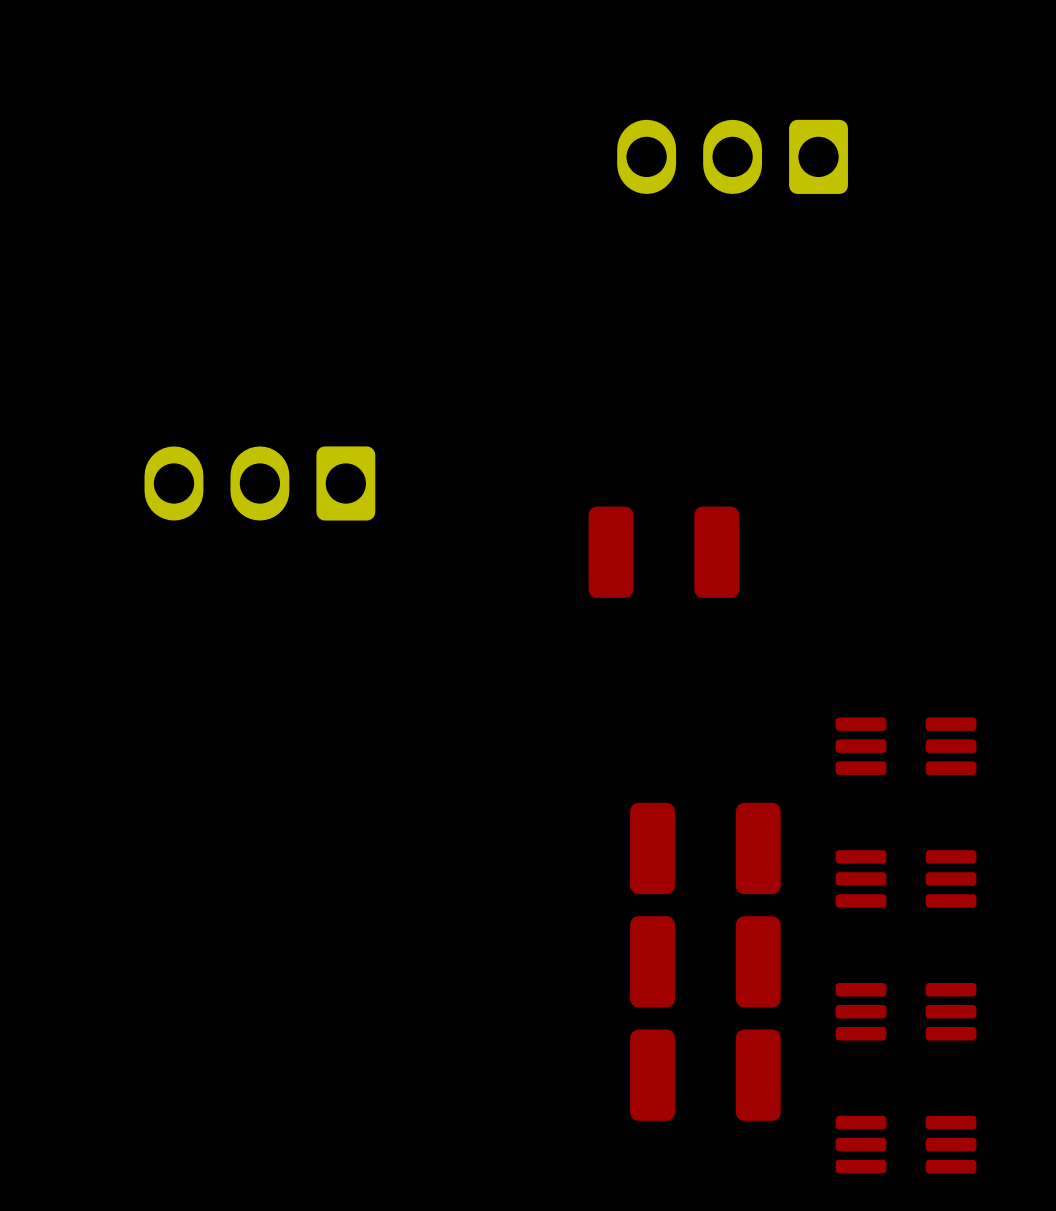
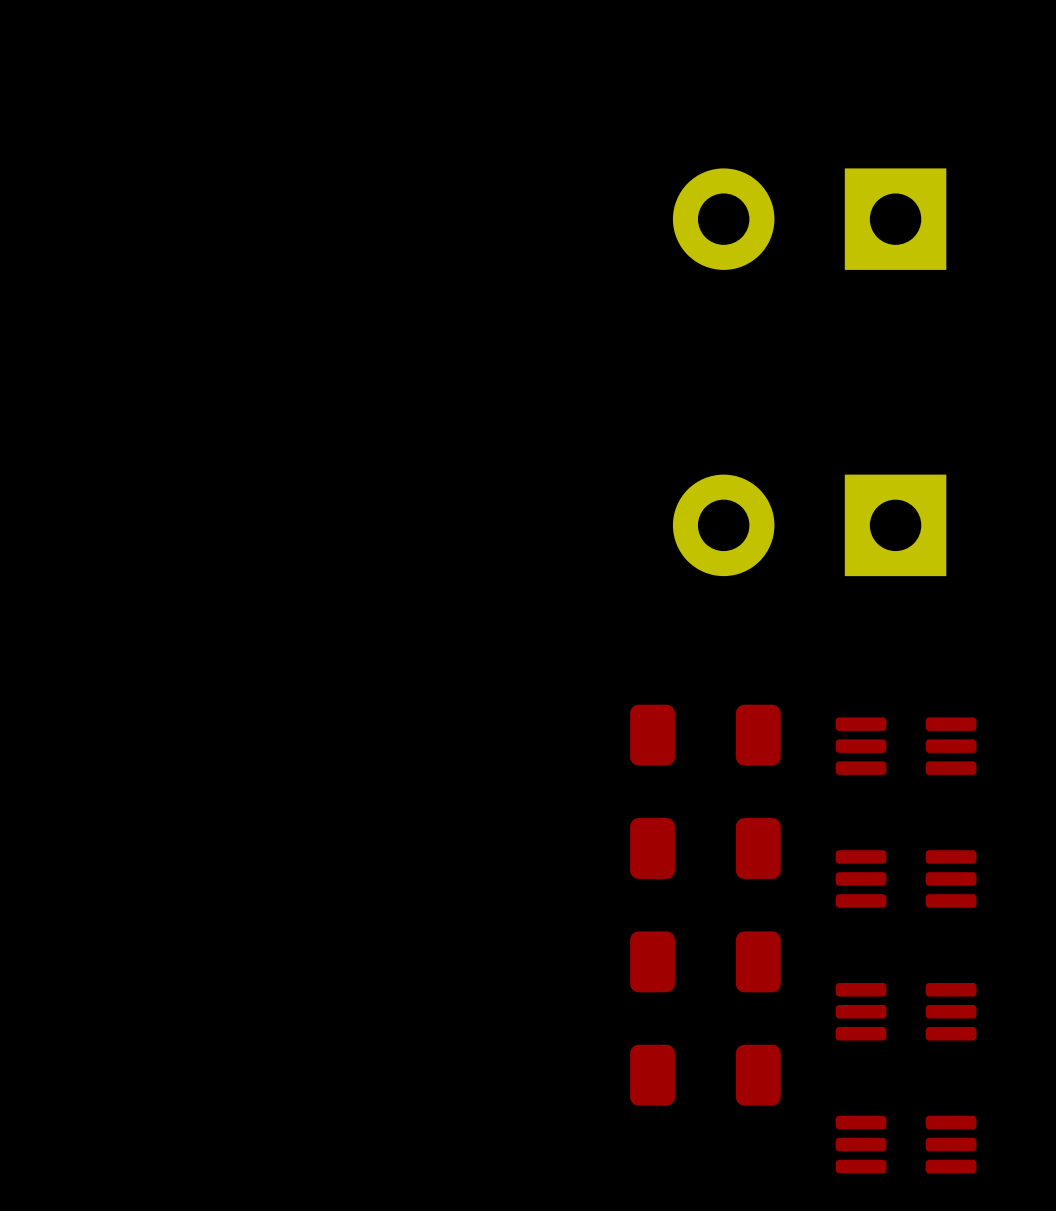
part: (732, 156) -> none
part: none -> (809, 219)
part: (259, 483) -> none
part: none -> (809, 525)
part: (663, 552) -> none
part: none -> (705, 735)
part footprint: [630, 802, 781, 895] -> [630, 818, 781, 879]
part footprint: [630, 916, 781, 1008] -> [630, 931, 781, 993]
part footprint: [630, 1029, 781, 1121] -> [630, 1044, 781, 1106]

